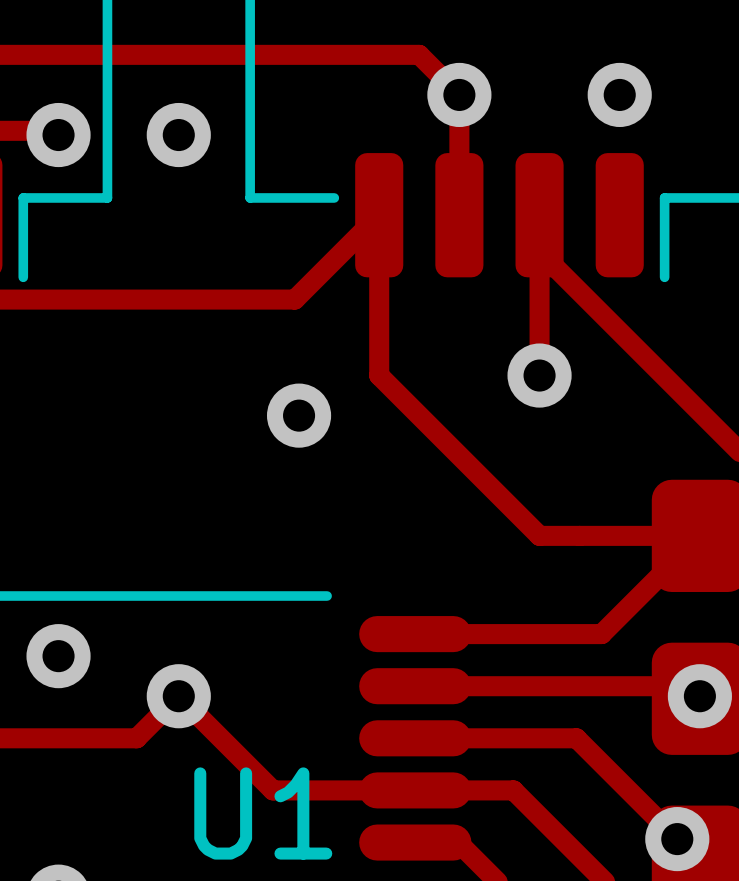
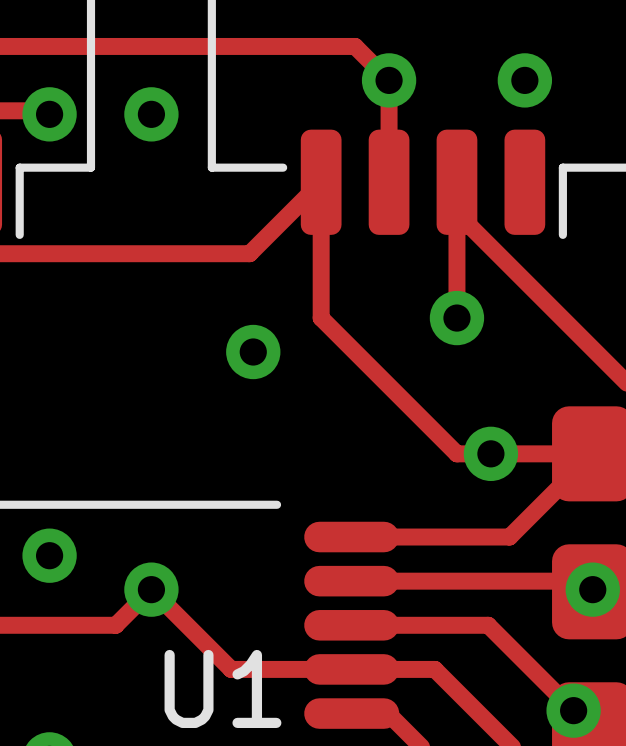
via: none -> (490, 453)

